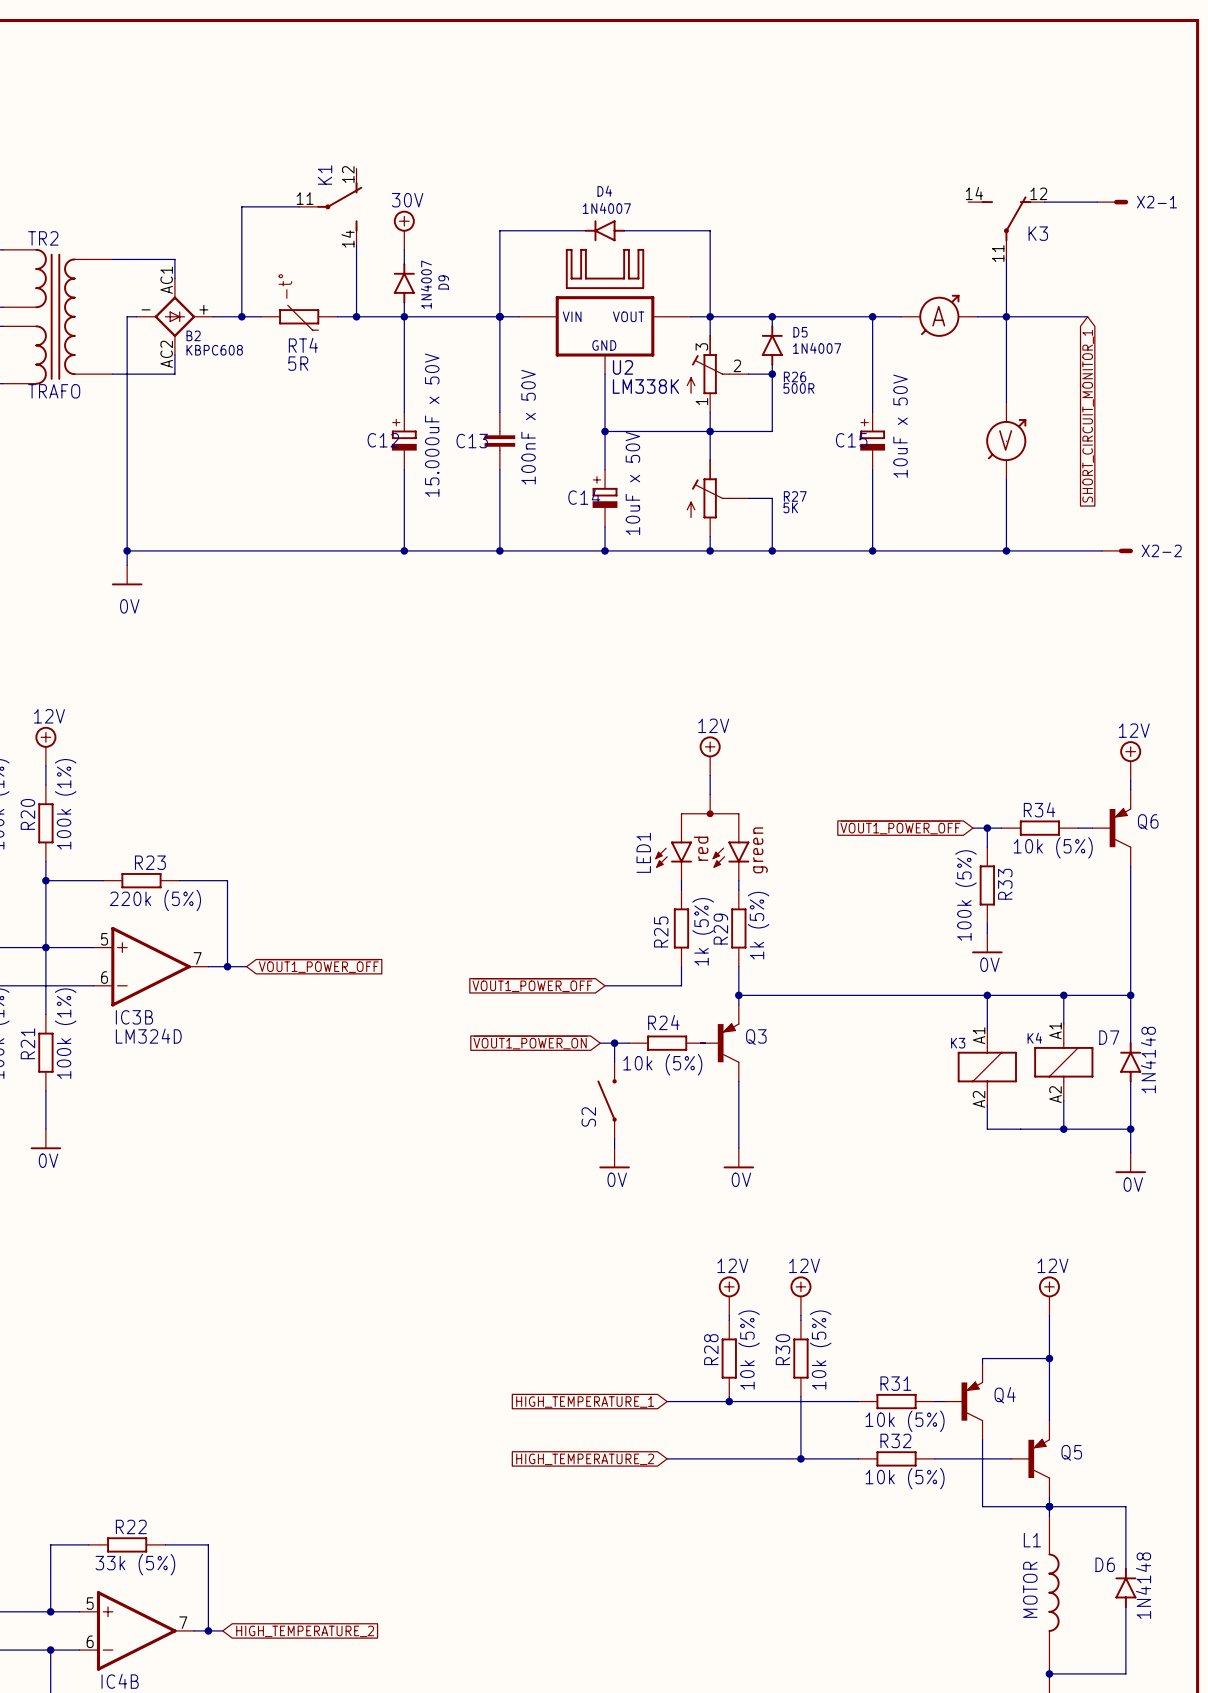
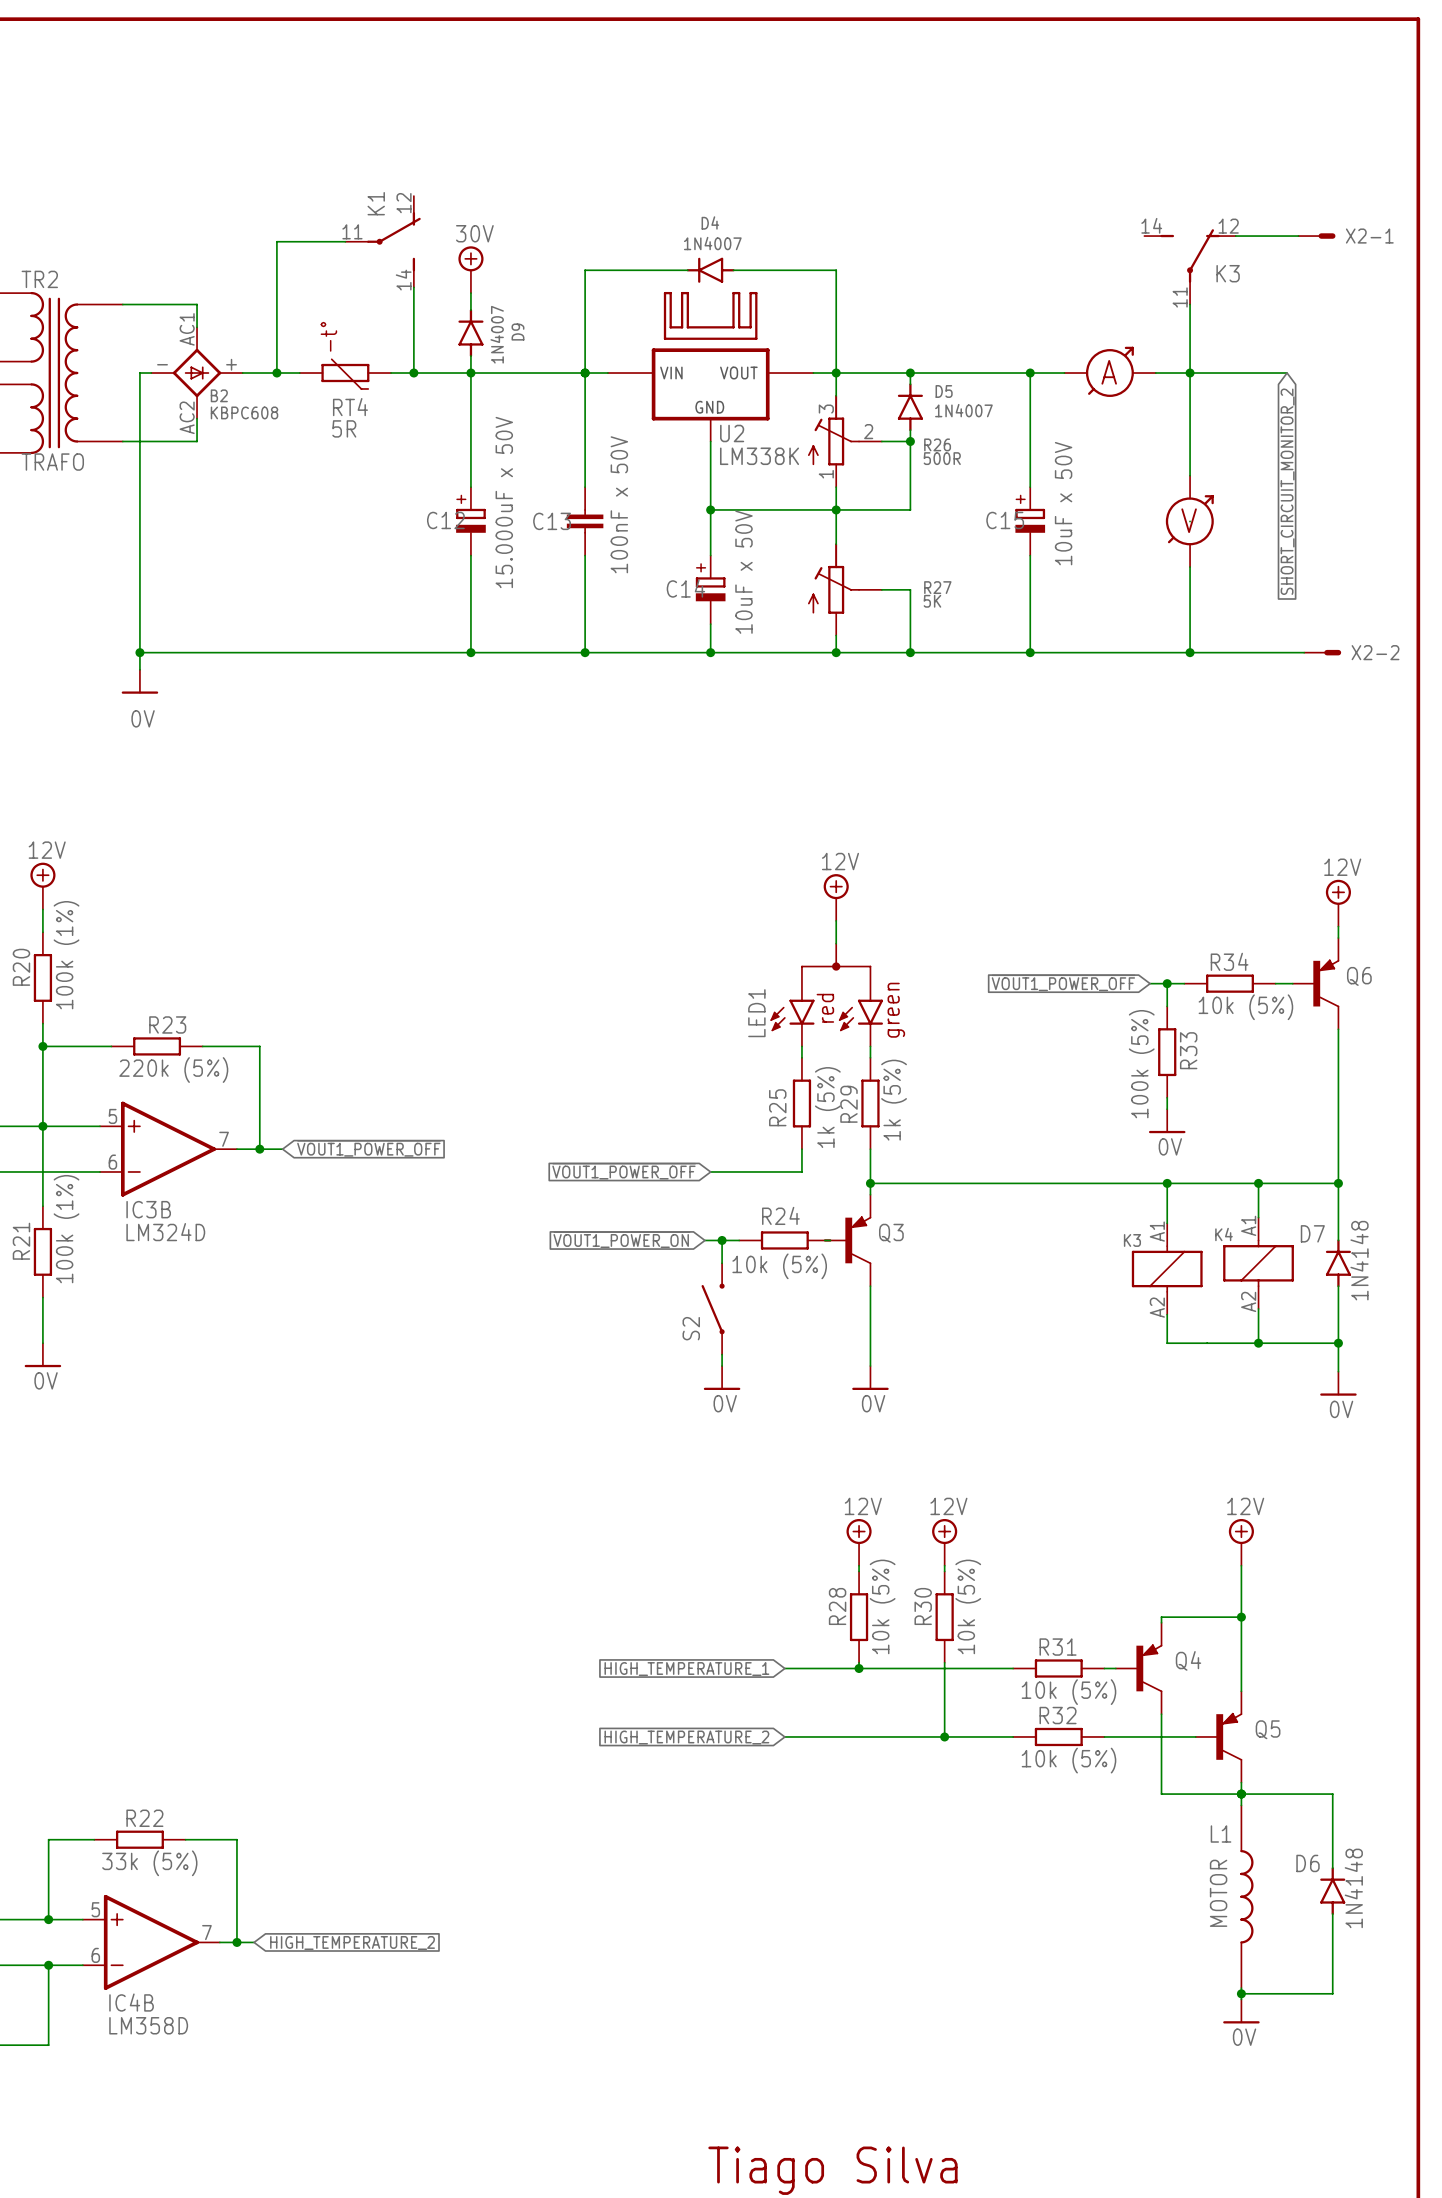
global label: SHORT_CIRCUIT_MONITOR_1 (1088, 416) -> SHORT_CIRCUIT_MONITOR_2 (1287, 491)

